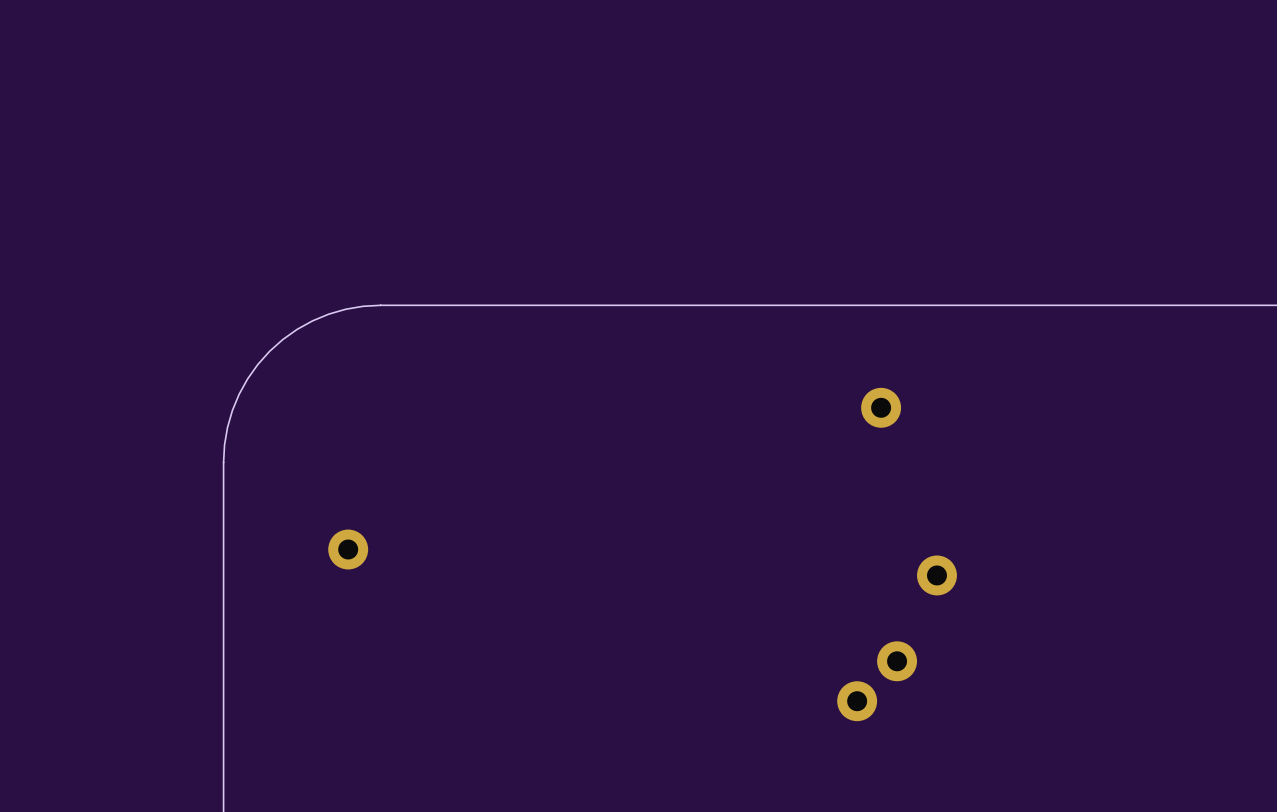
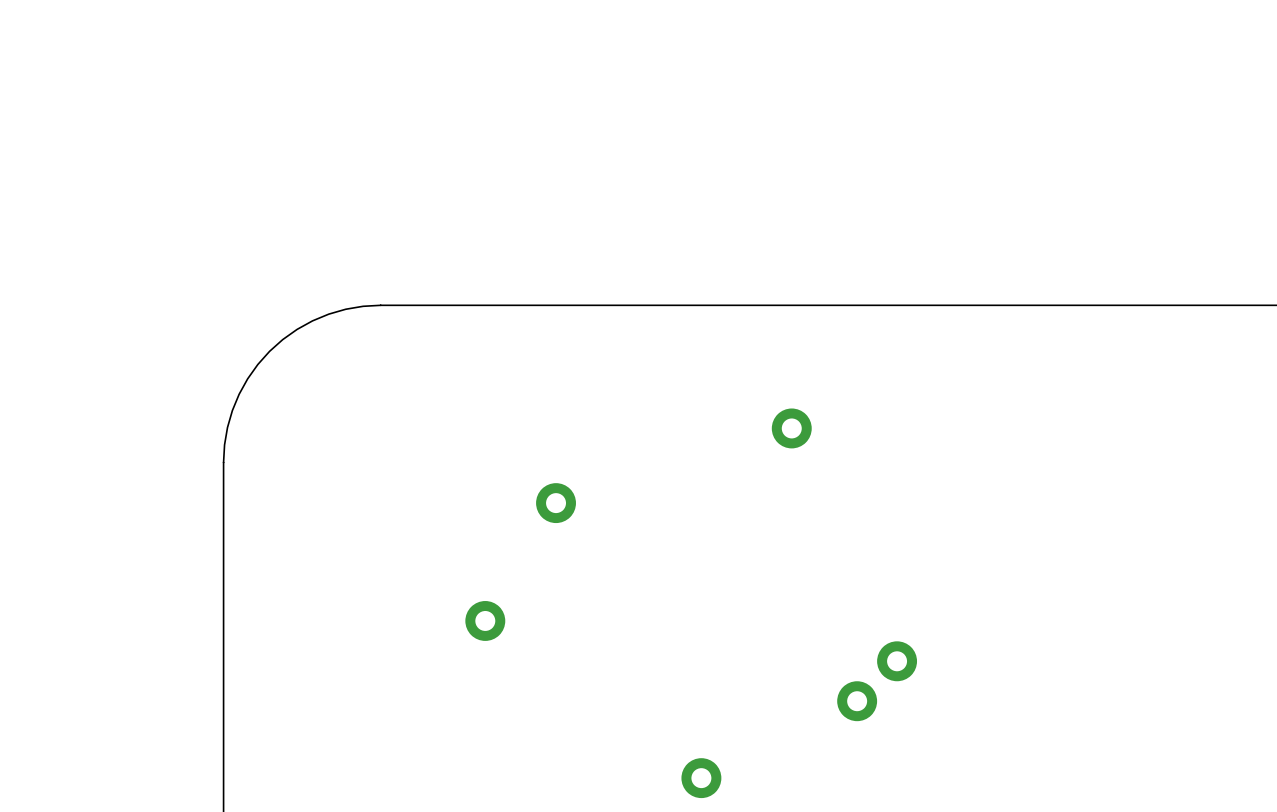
via position: (881, 407) -> (791, 428)
via: none -> (556, 503)
via: (348, 549) -> none
via: (936, 575) -> none
via: none -> (485, 620)
via: none -> (701, 778)

